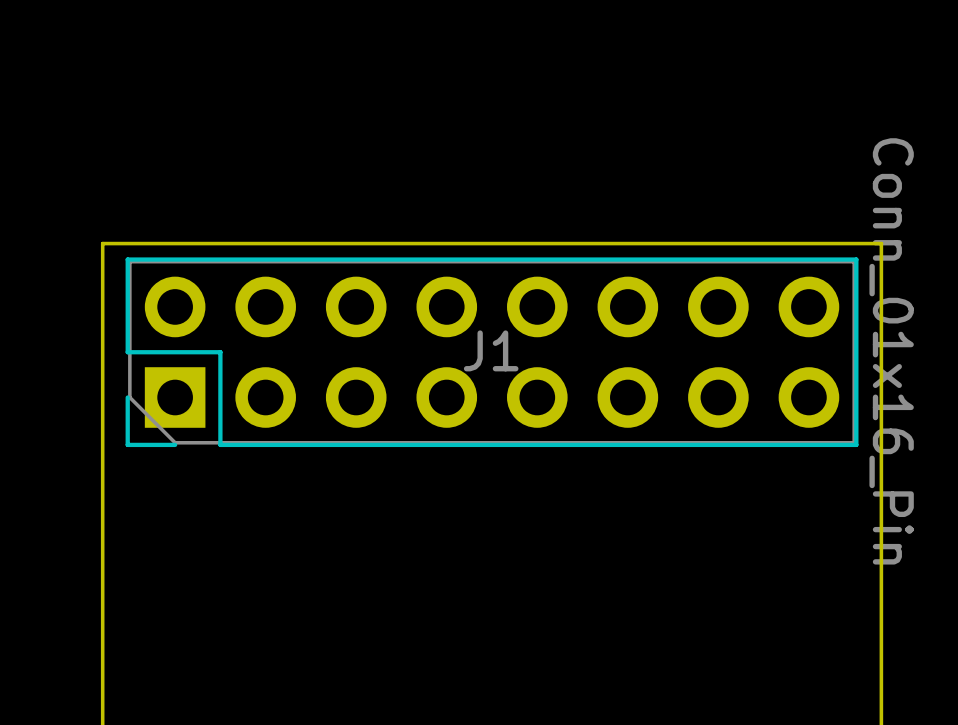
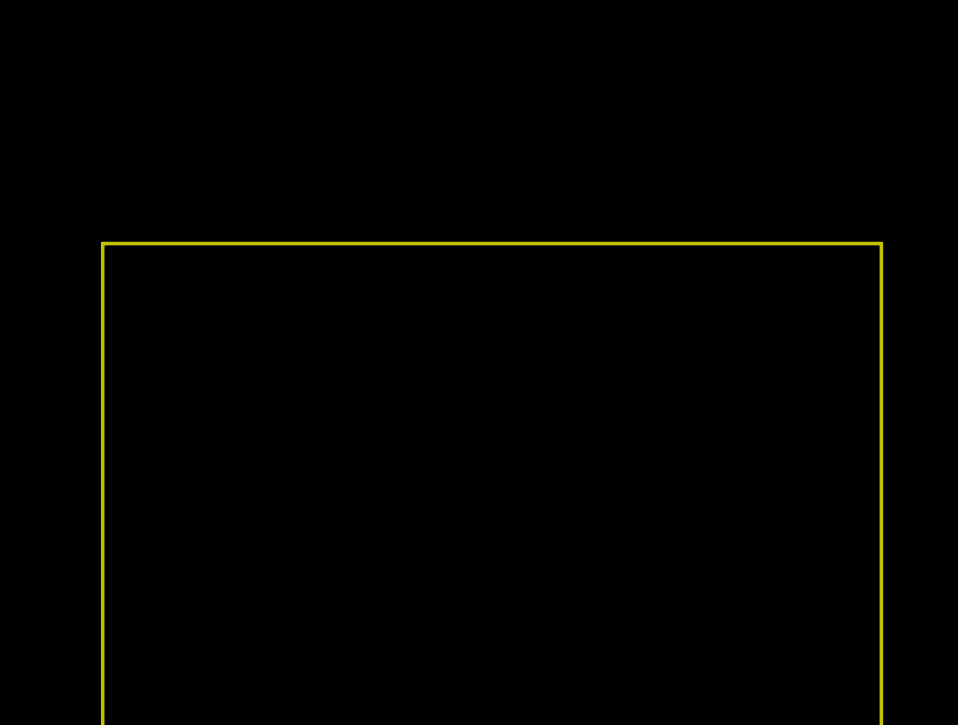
J1: Conn_01x16_Pin (492, 352) -> none

